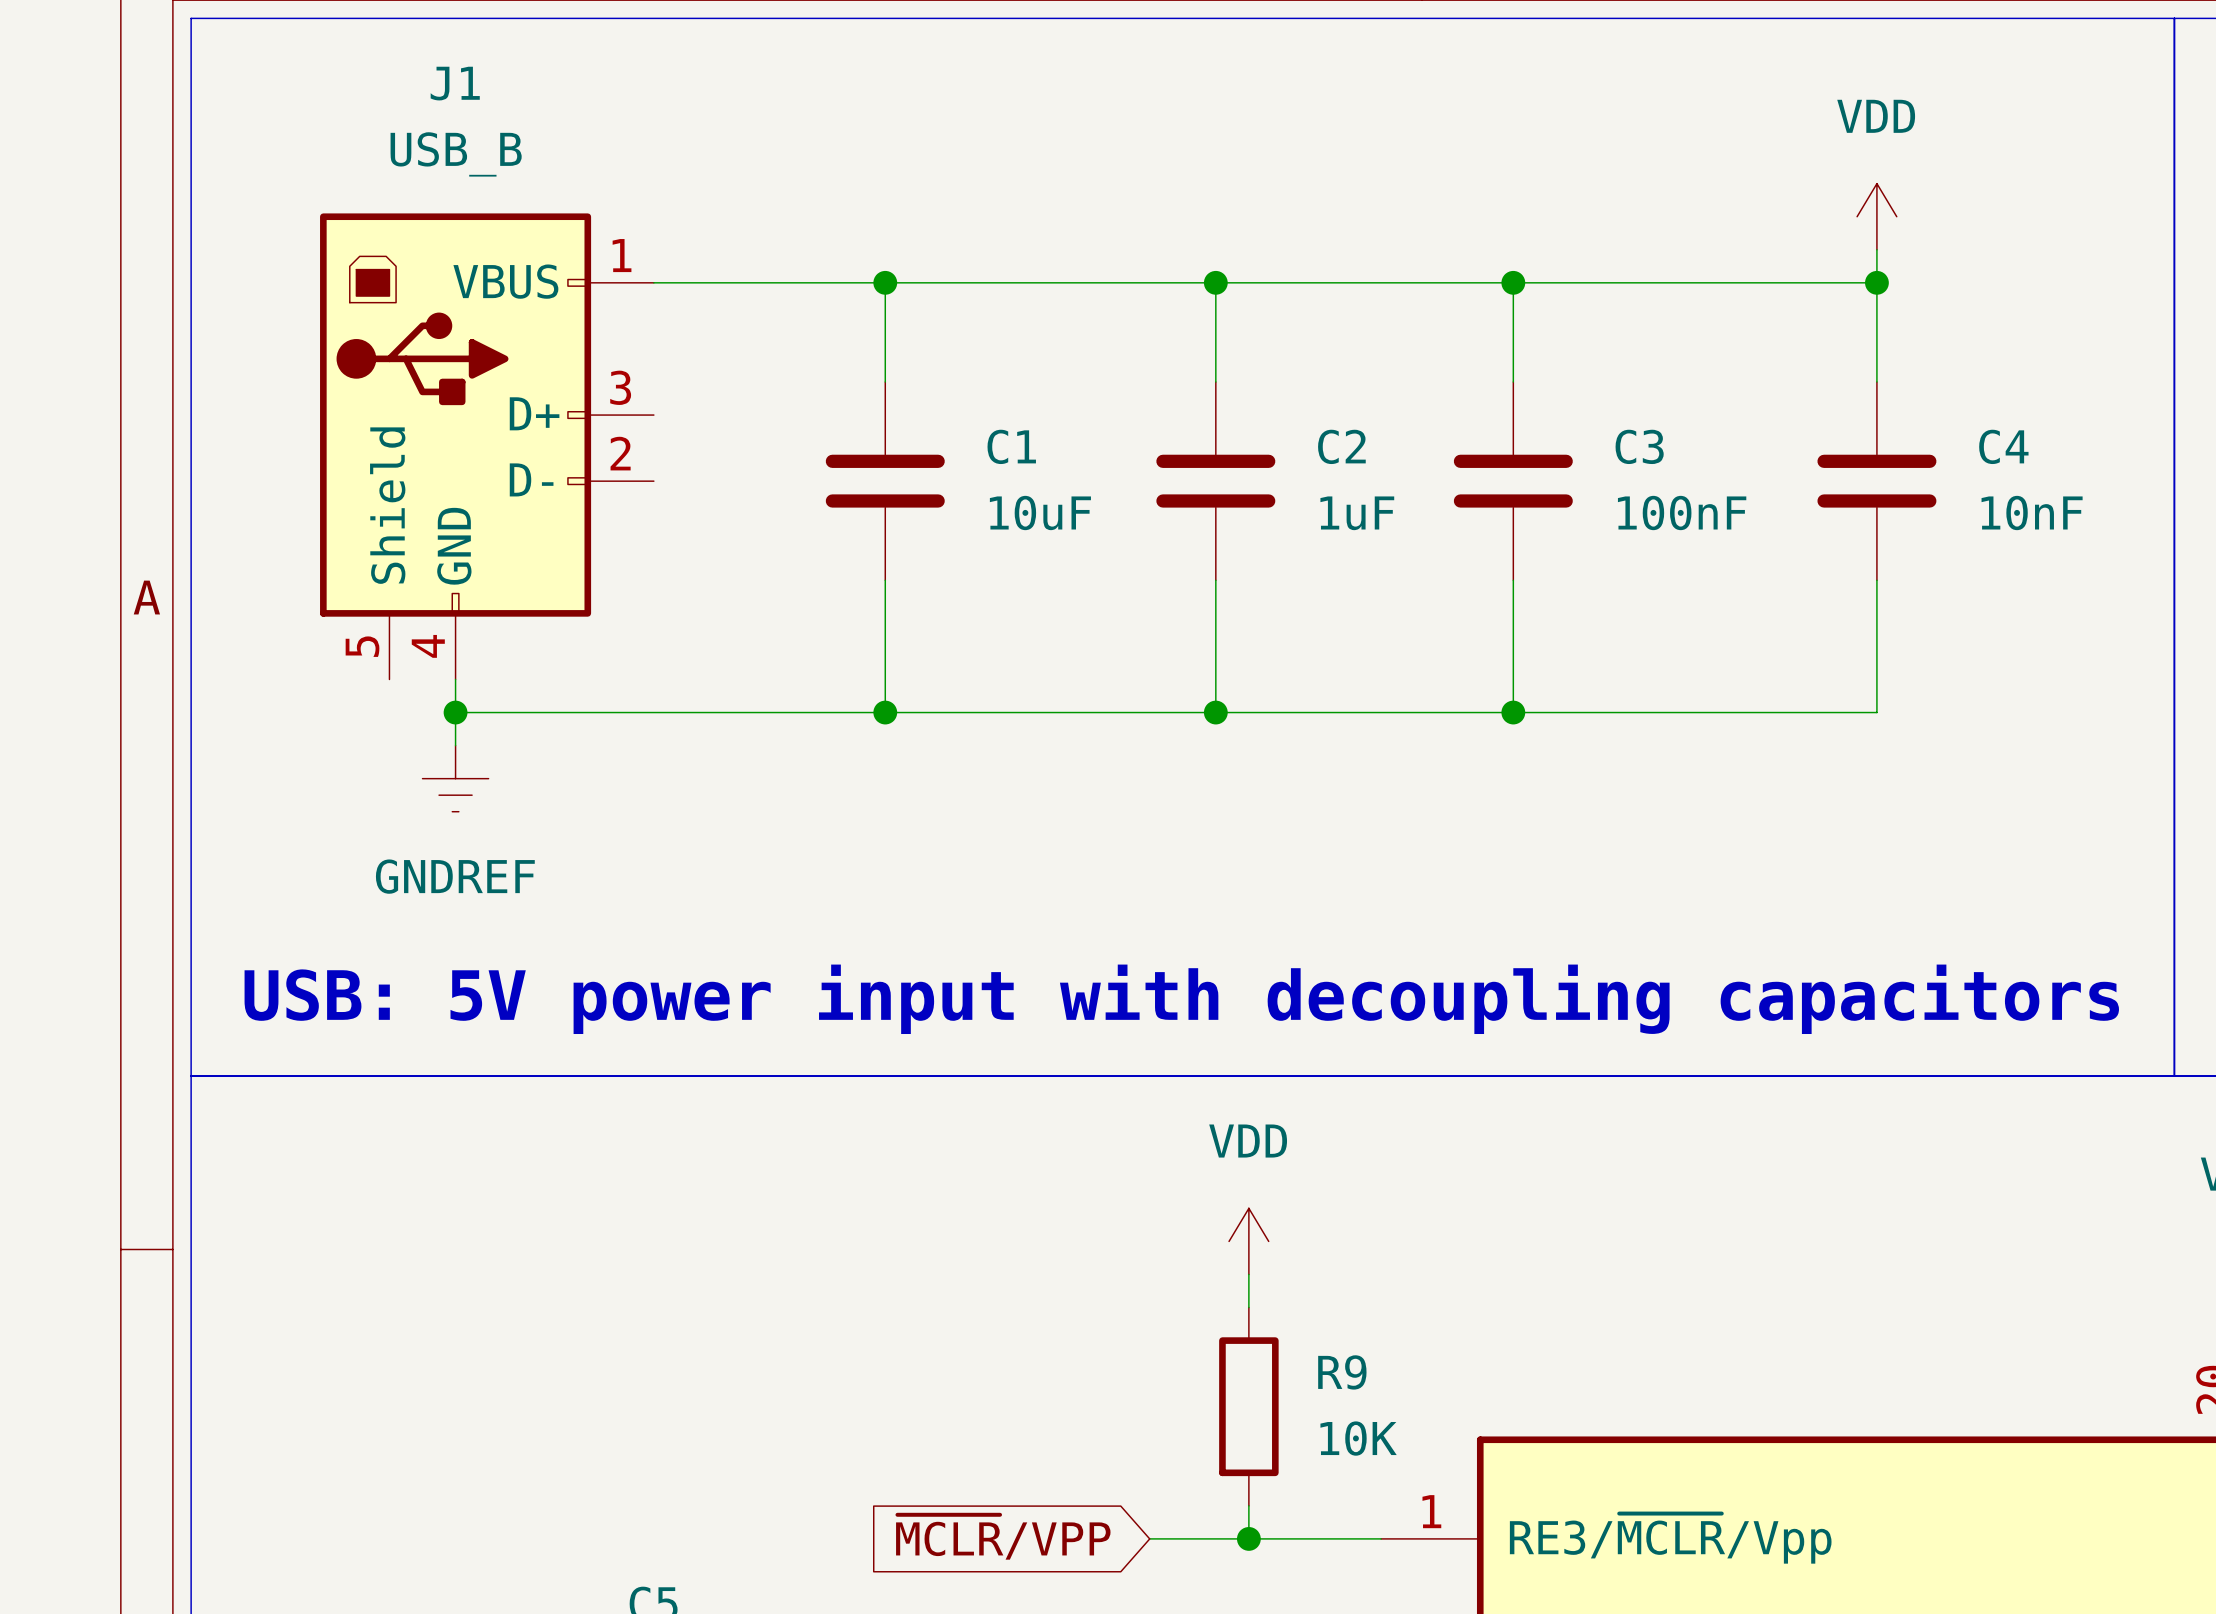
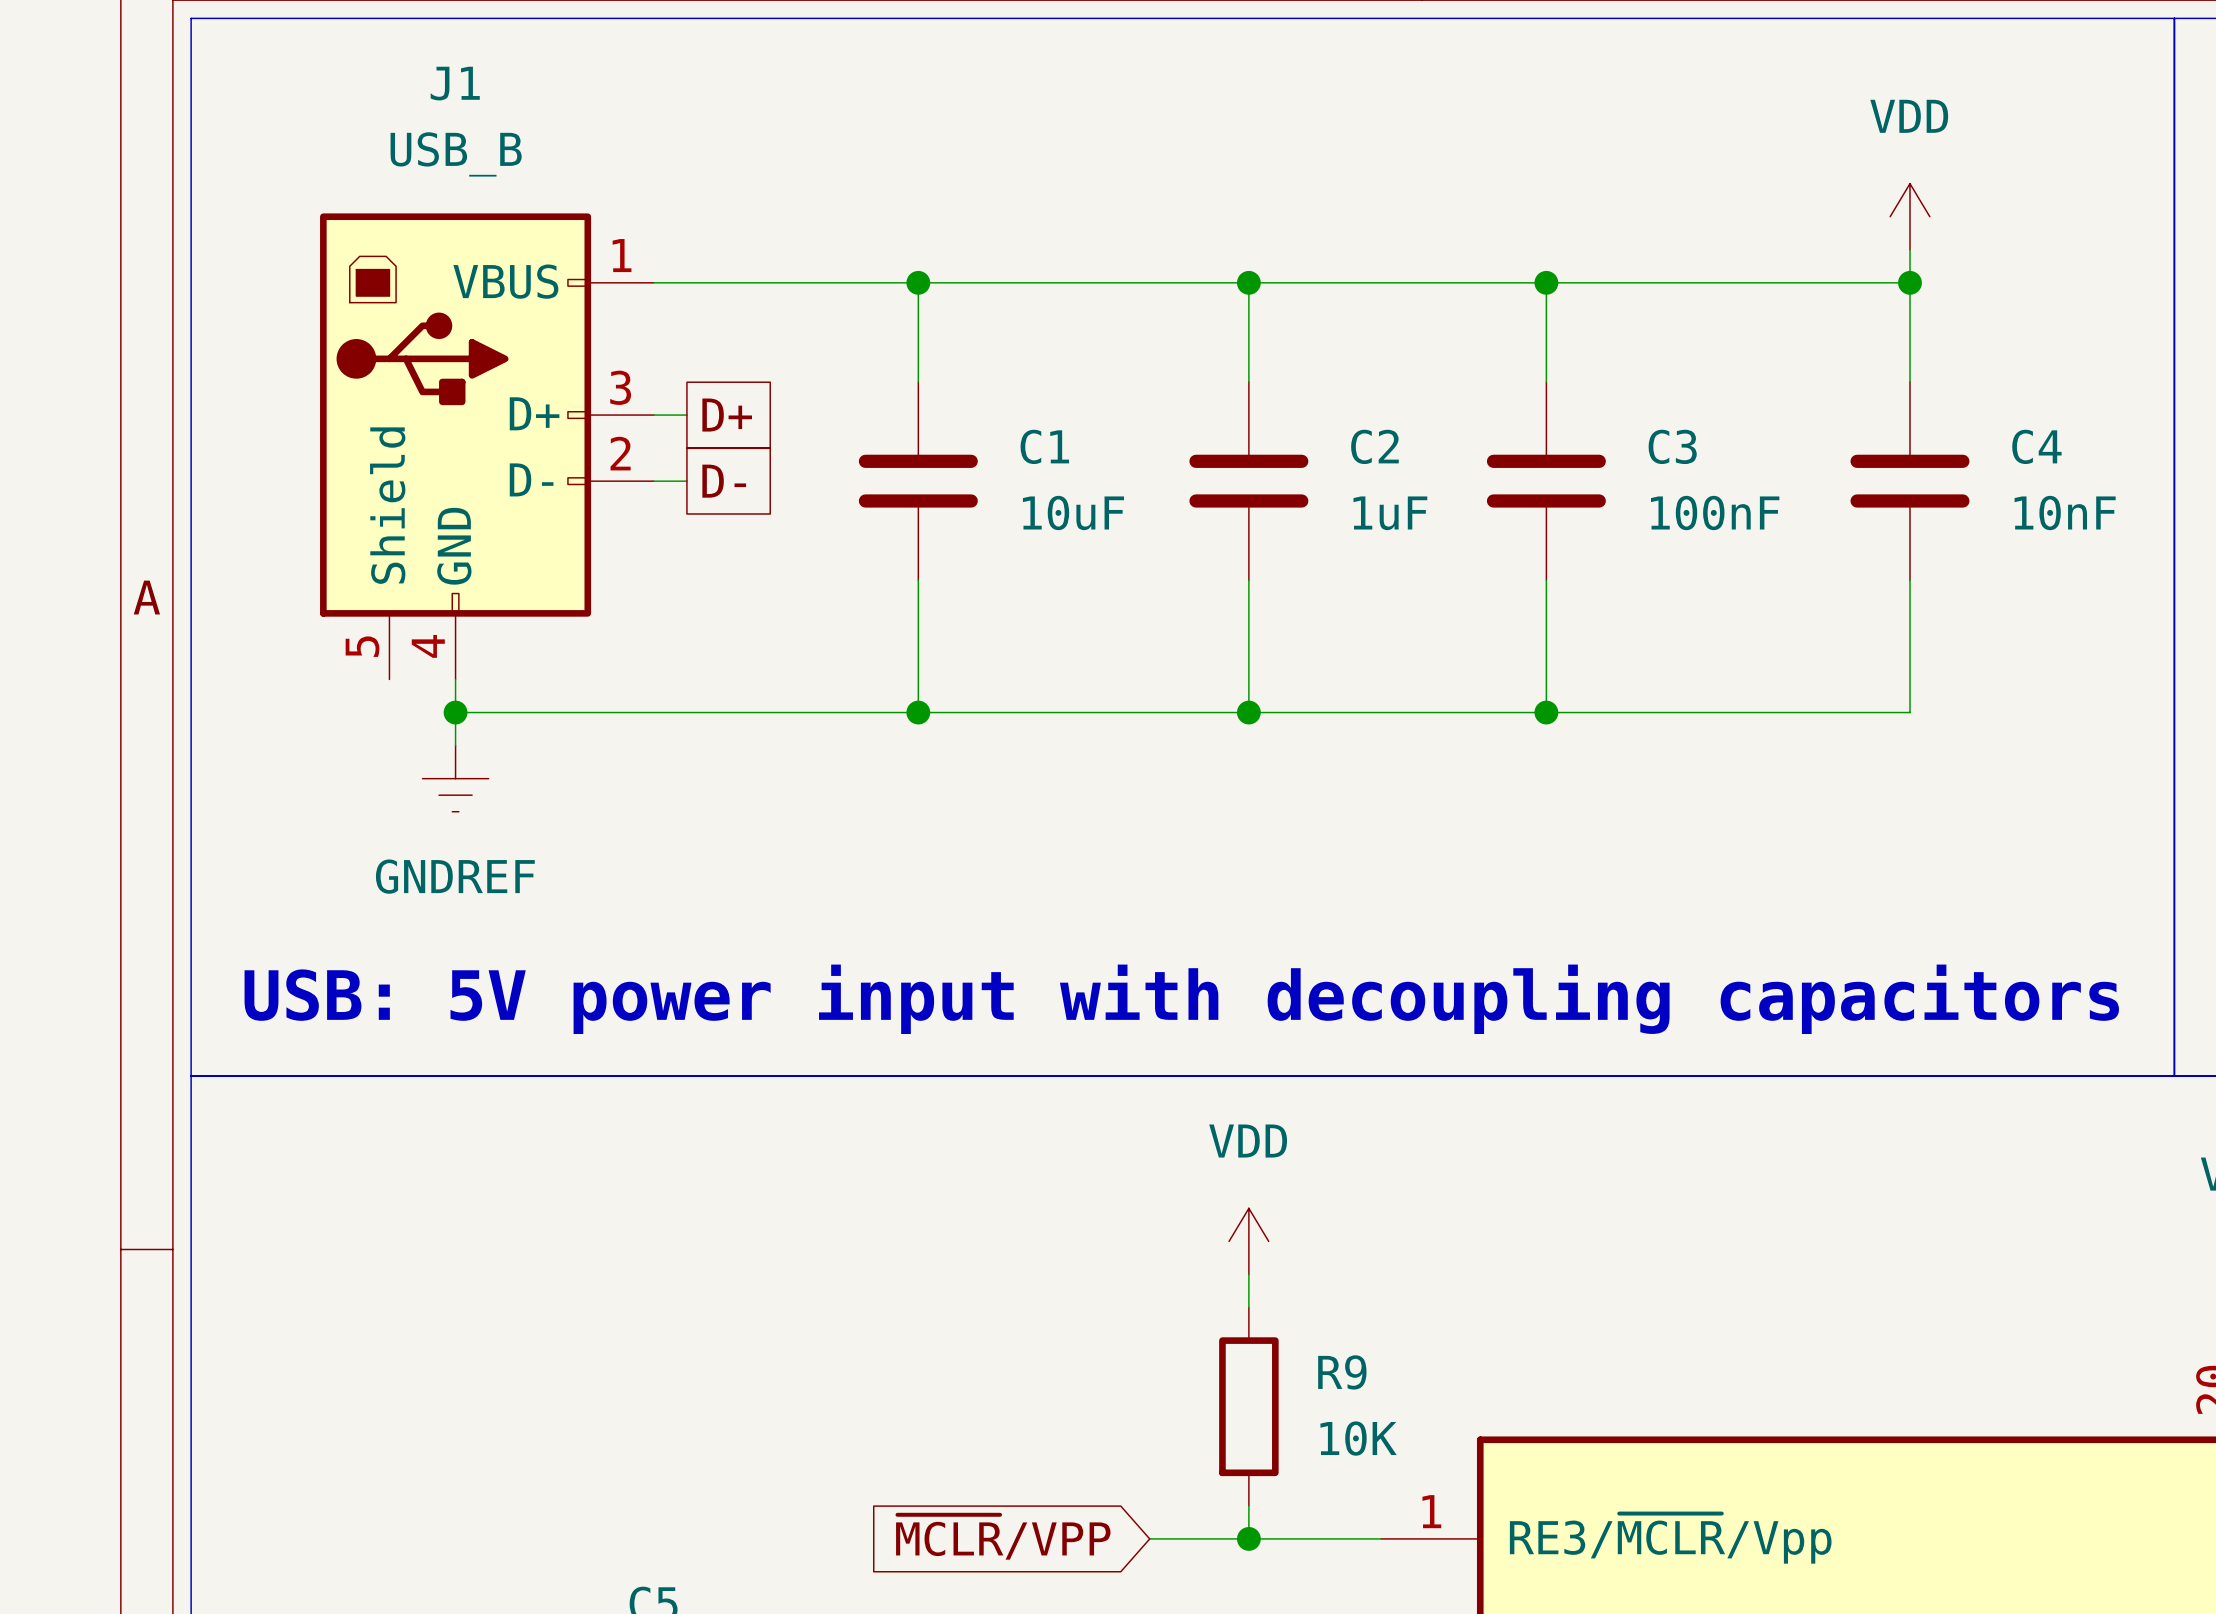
power symbol position: VDD (1876, 216) -> VDD (1909, 216)
wire: (1876, 249) (1876, 381) -> (1909, 249) (1909, 381)
wire: (885, 282) (885, 381) -> (918, 282) (918, 381)
junction position: (885, 282) -> (918, 282)
wire: (1215, 282) (1215, 381) -> (1248, 282) (1248, 381)
junction position: (1215, 282) -> (1248, 282)
wire: (1513, 282) (1513, 381) -> (1546, 282) (1546, 381)
junction position: (1513, 282) -> (1546, 282)
wire: none -> (1876, 282) (1909, 282)
junction position: (1876, 282) -> (1909, 282)
wire: none -> (653, 415) (686, 415)
global label: none -> D+ (727, 415)
wire: none -> (653, 481) (686, 481)
global label: none -> D- (724, 481)
C1 position: (885, 481) -> (918, 481)
C2 position: (1215, 481) -> (1248, 481)
C3 position: (1513, 481) -> (1546, 481)
C4 position: (1876, 481) -> (1909, 481)
wire: (885, 580) (885, 712) -> (918, 580) (918, 712)
wire: (1215, 580) (1215, 712) -> (1248, 580) (1248, 712)
wire: (1513, 580) (1513, 712) -> (1546, 580) (1546, 712)
wire: (1876, 580) (1876, 712) -> (1909, 580) (1909, 712) (1876, 712)
junction position: (885, 712) -> (918, 712)
junction position: (1215, 712) -> (1248, 712)
junction position: (1513, 712) -> (1546, 712)

